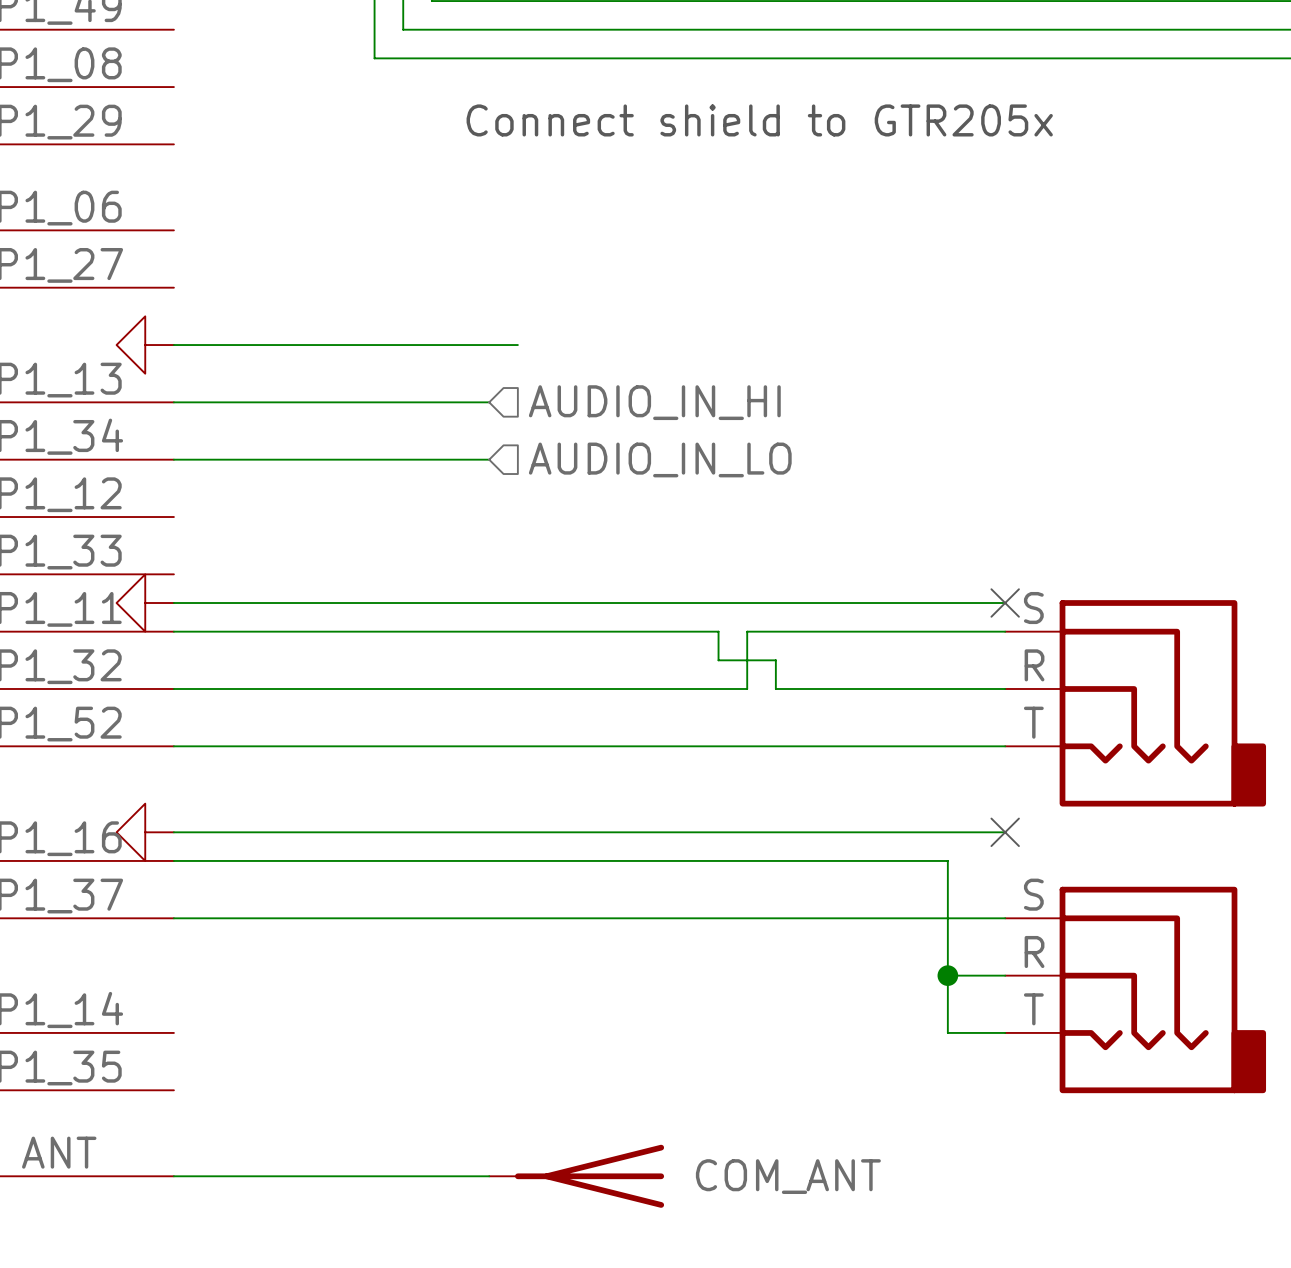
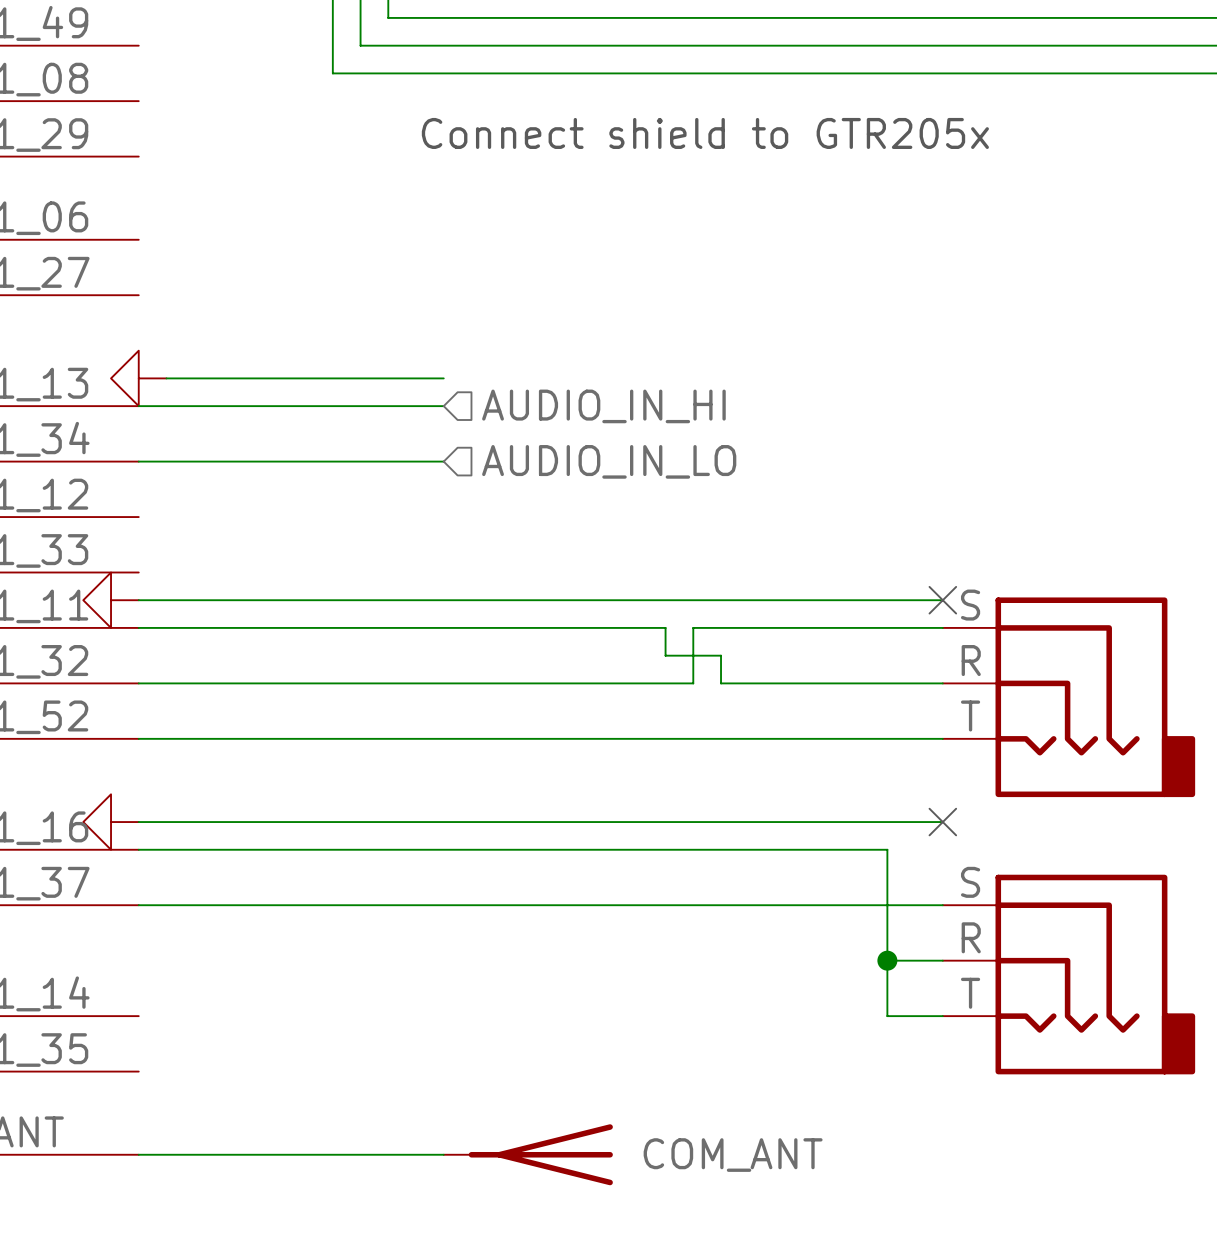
power symbol position: (145, 345) -> (138, 378)
wire: (173, 345) (517, 345) -> none
wire: none -> (166, 378) (443, 378)

